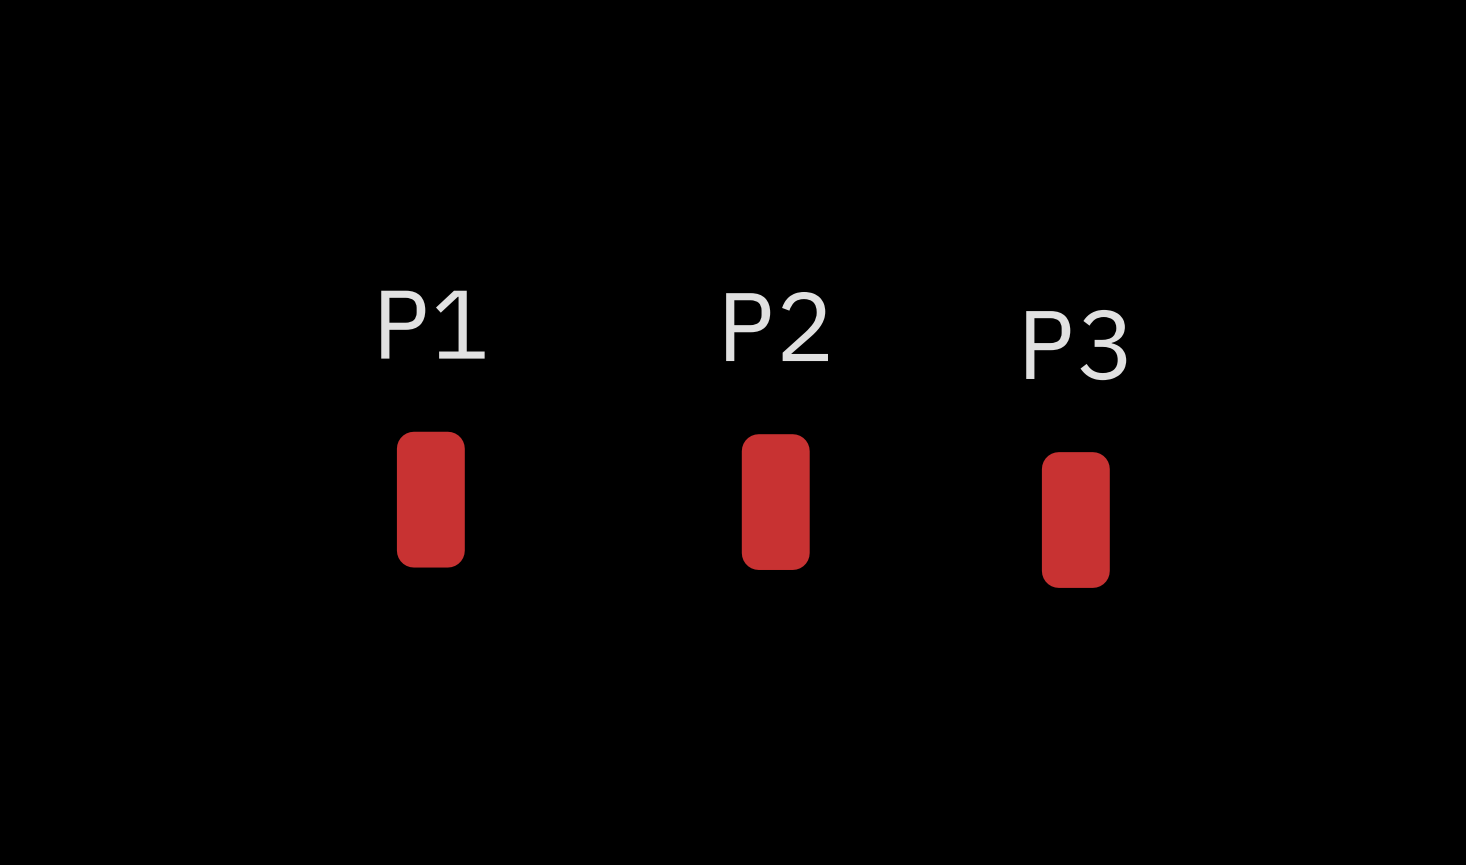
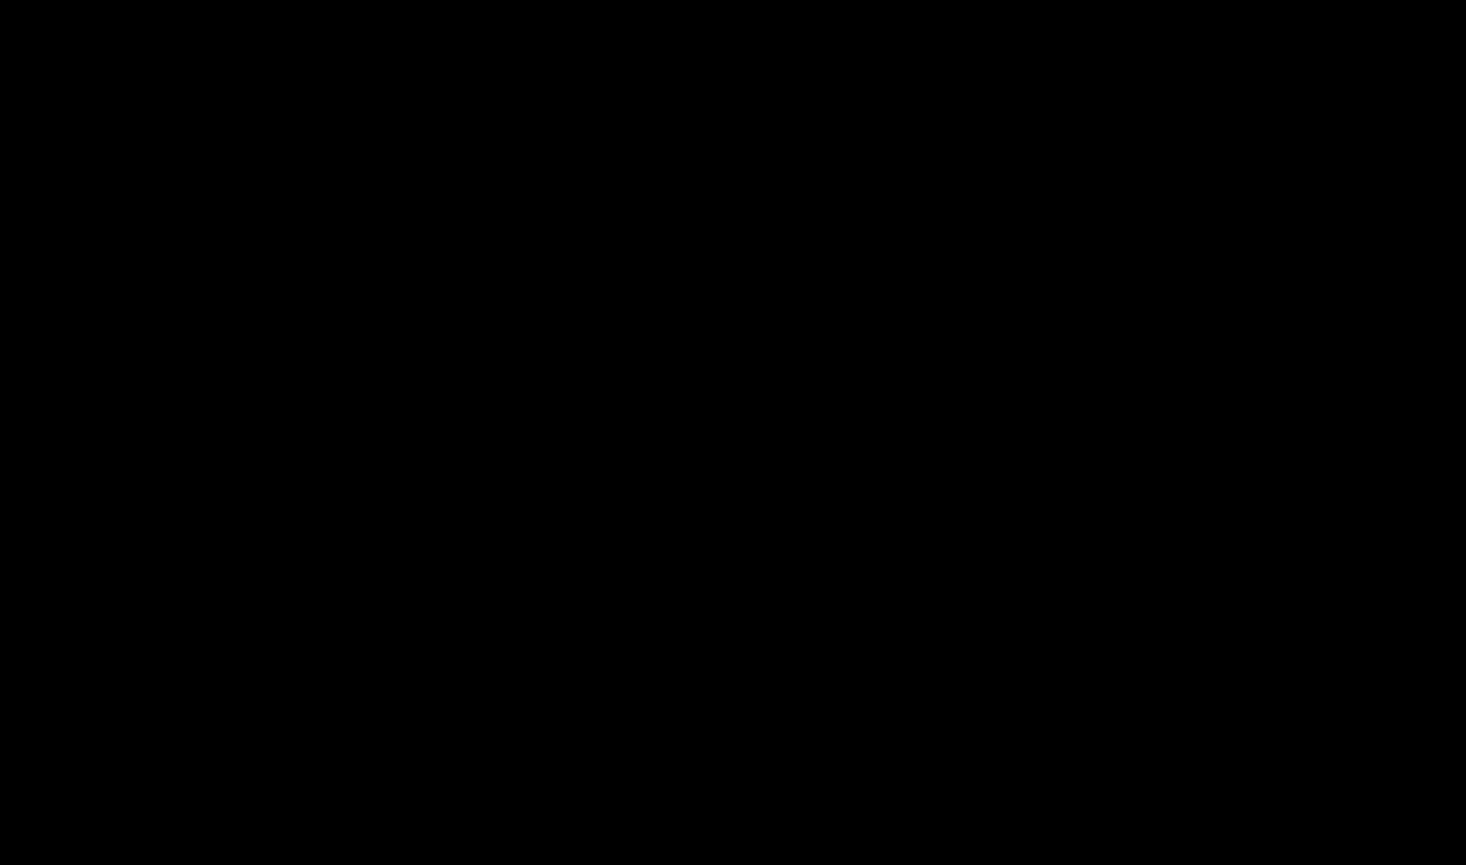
P1: (430, 499) -> none
P2: (775, 502) -> none
P3: (1075, 520) -> none

